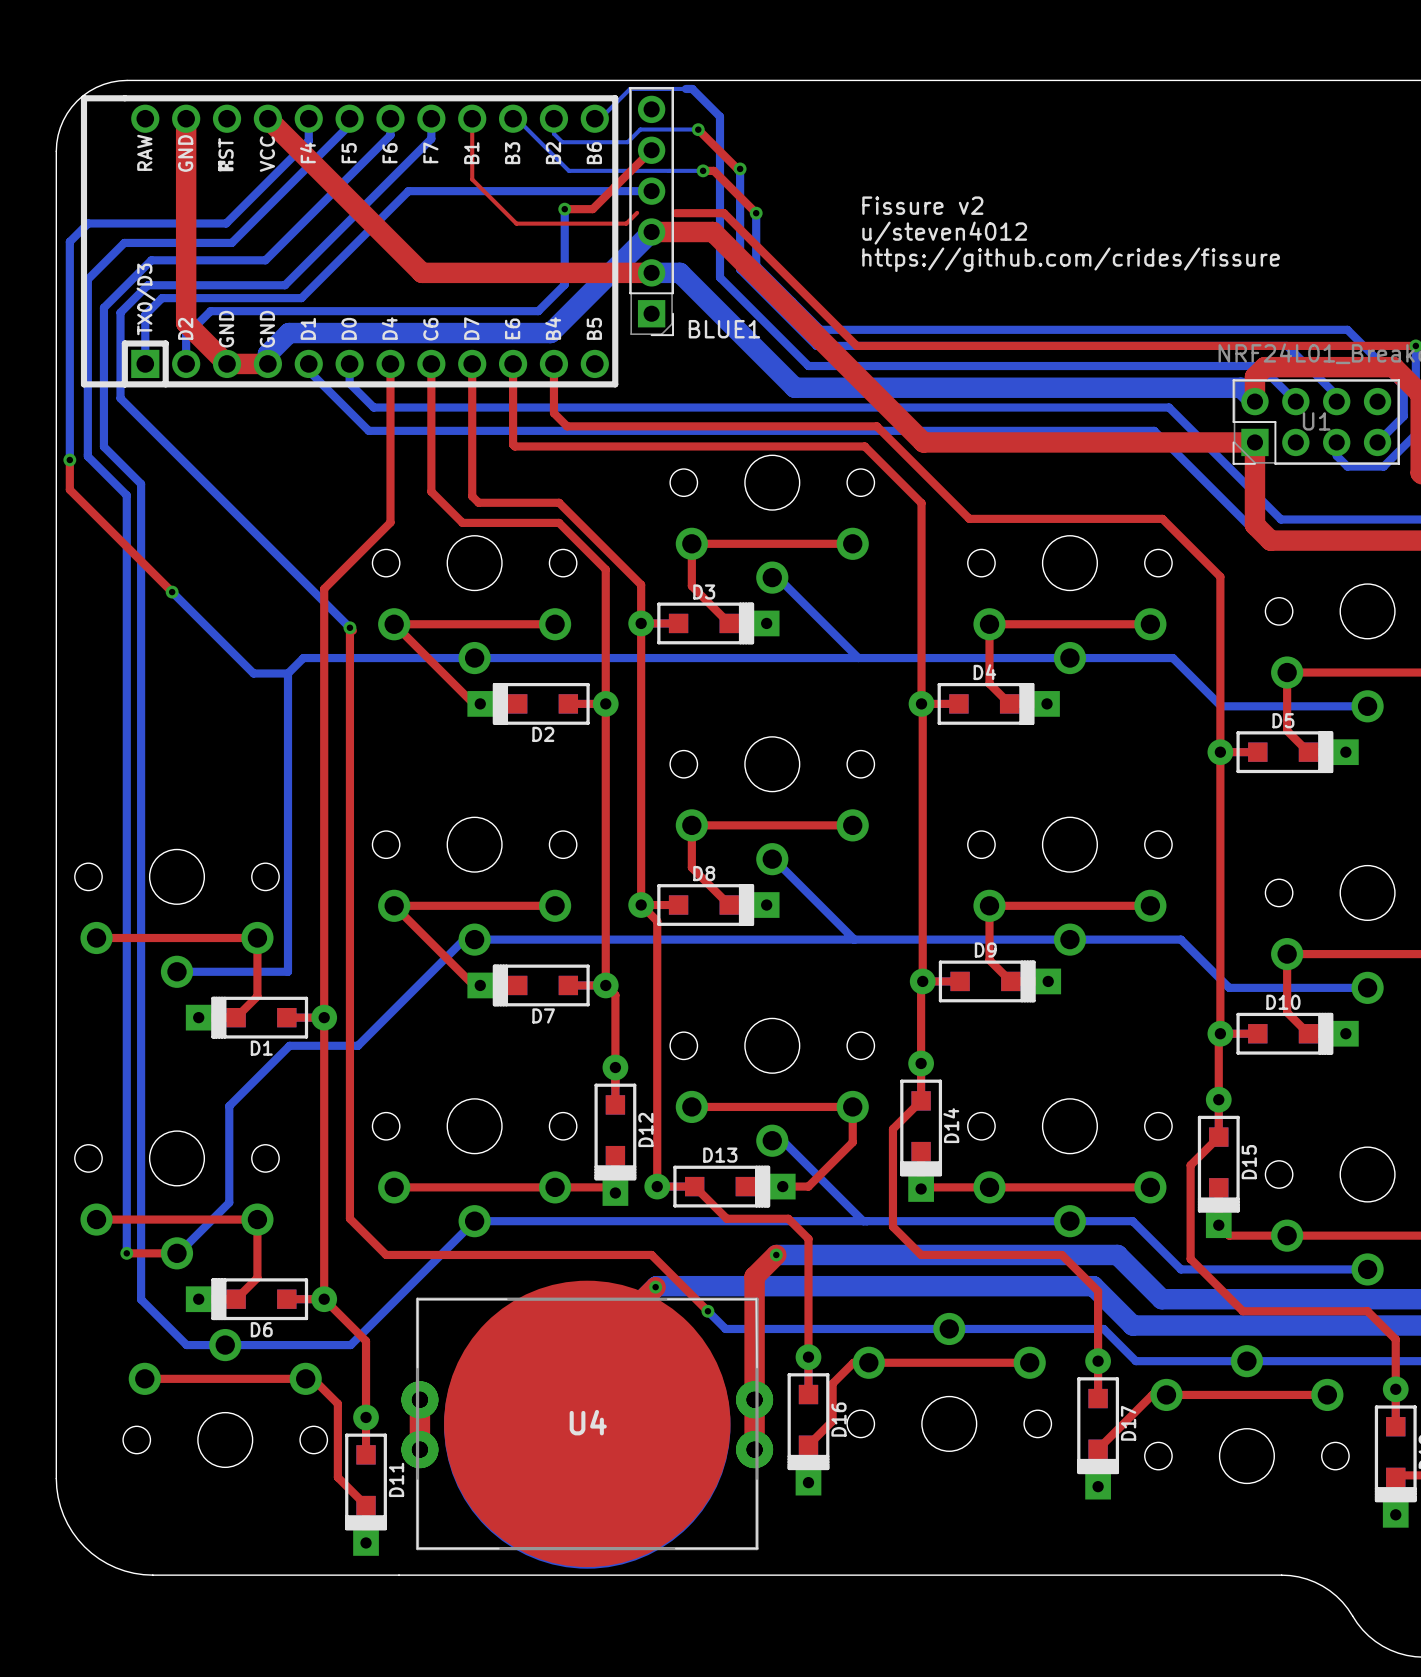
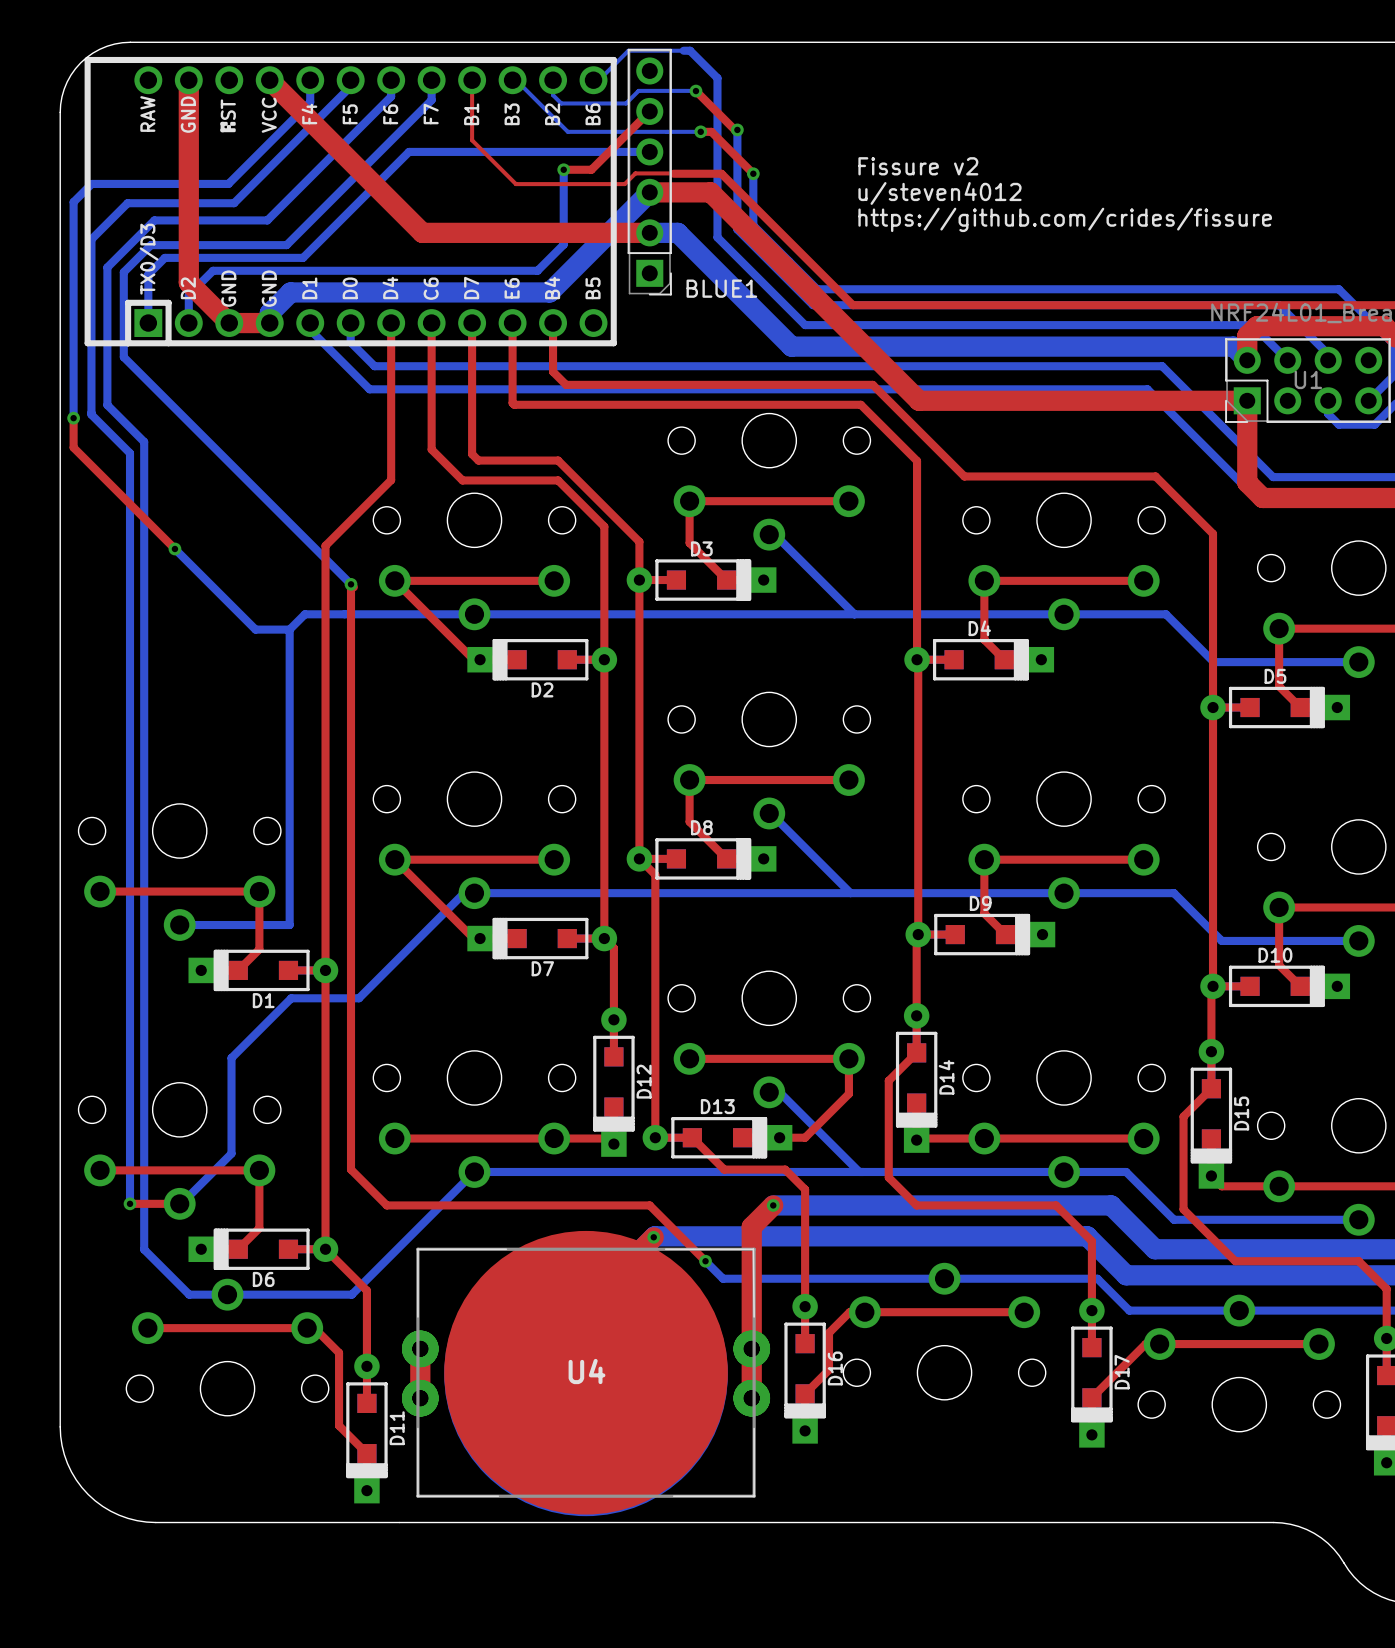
top track: none -> (635, 173) (673, 173)

